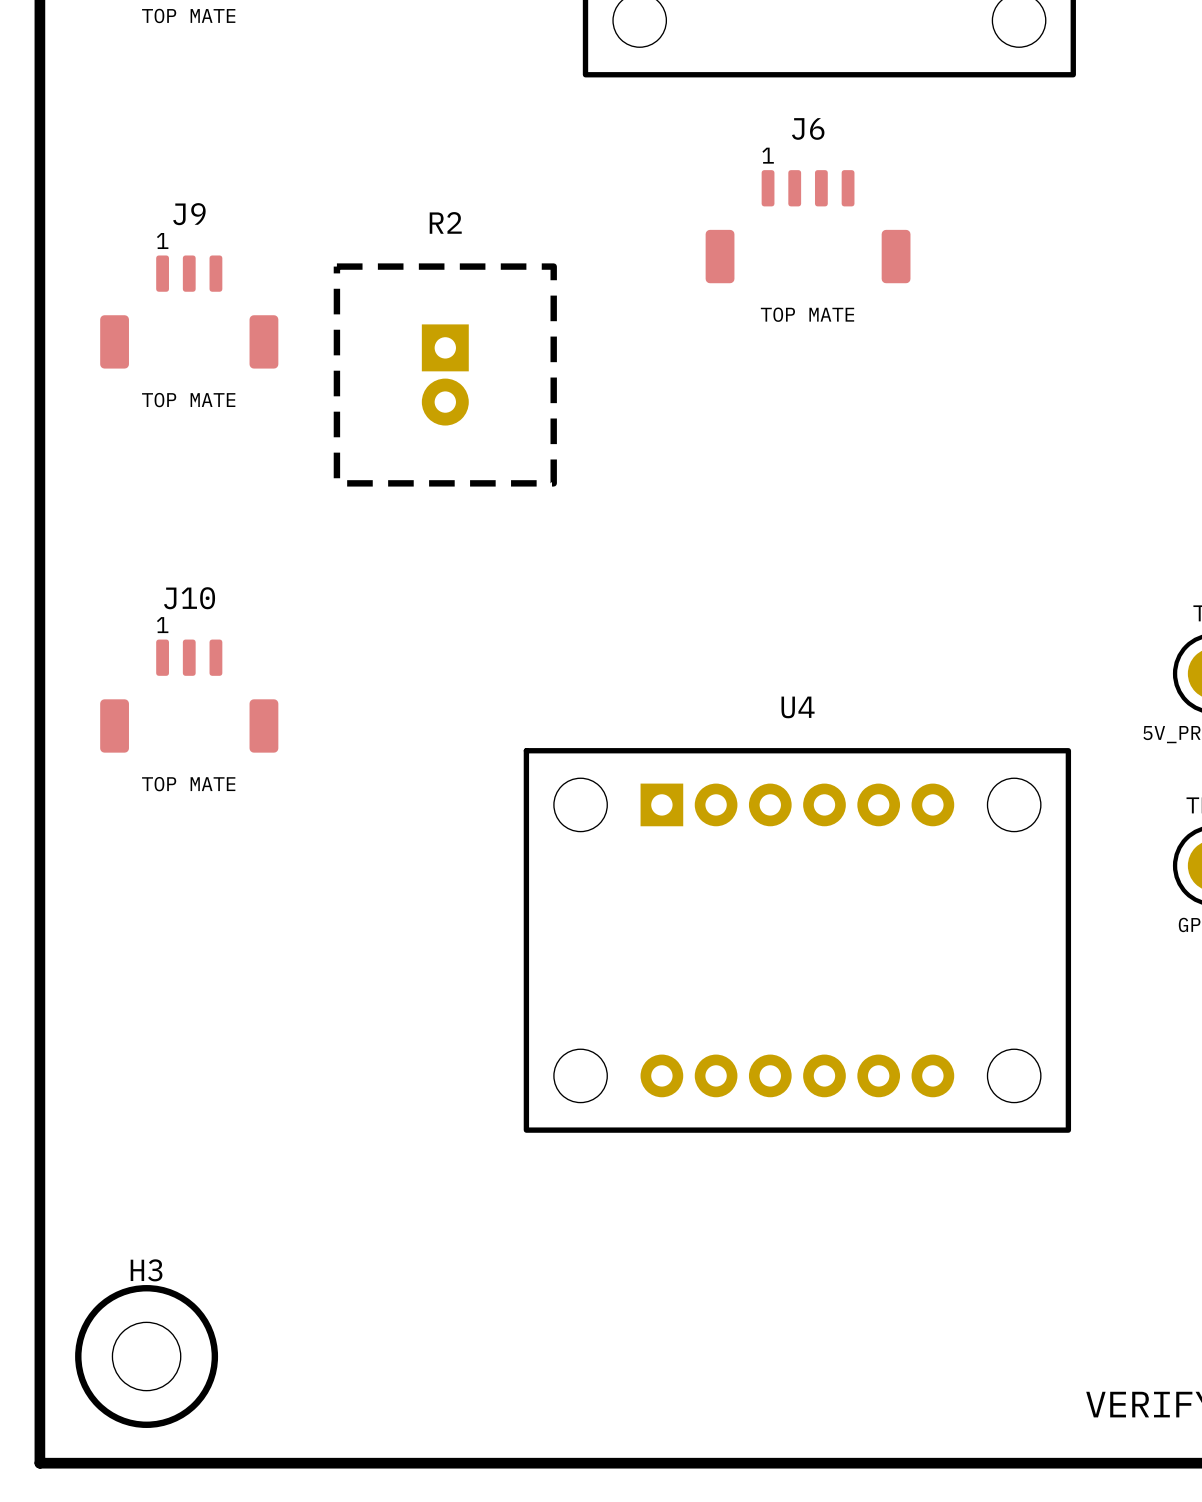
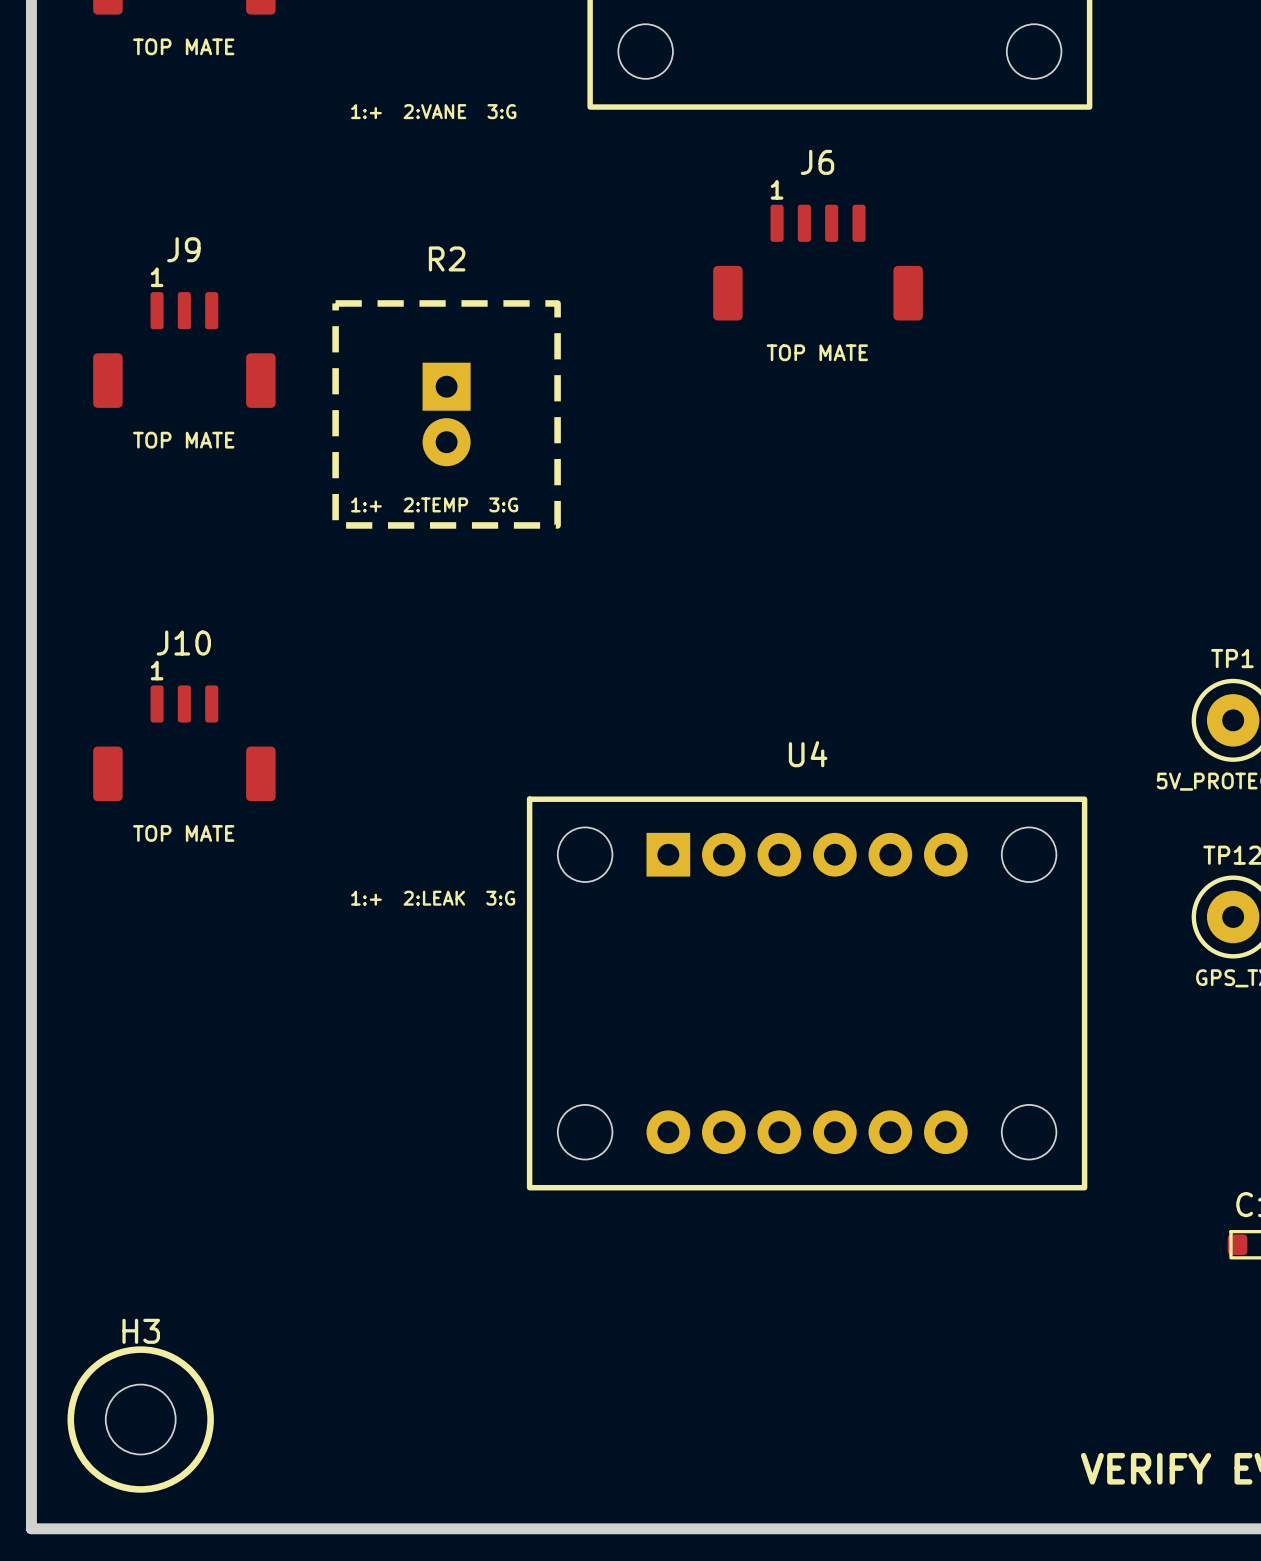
text: none -> 1:+ 2:VANE 3:G (433, 111)
text: none -> 1:+ 2:TEMP 3:G (434, 504)
text: none -> 1:+ 2:LEAK 3:G (433, 898)

